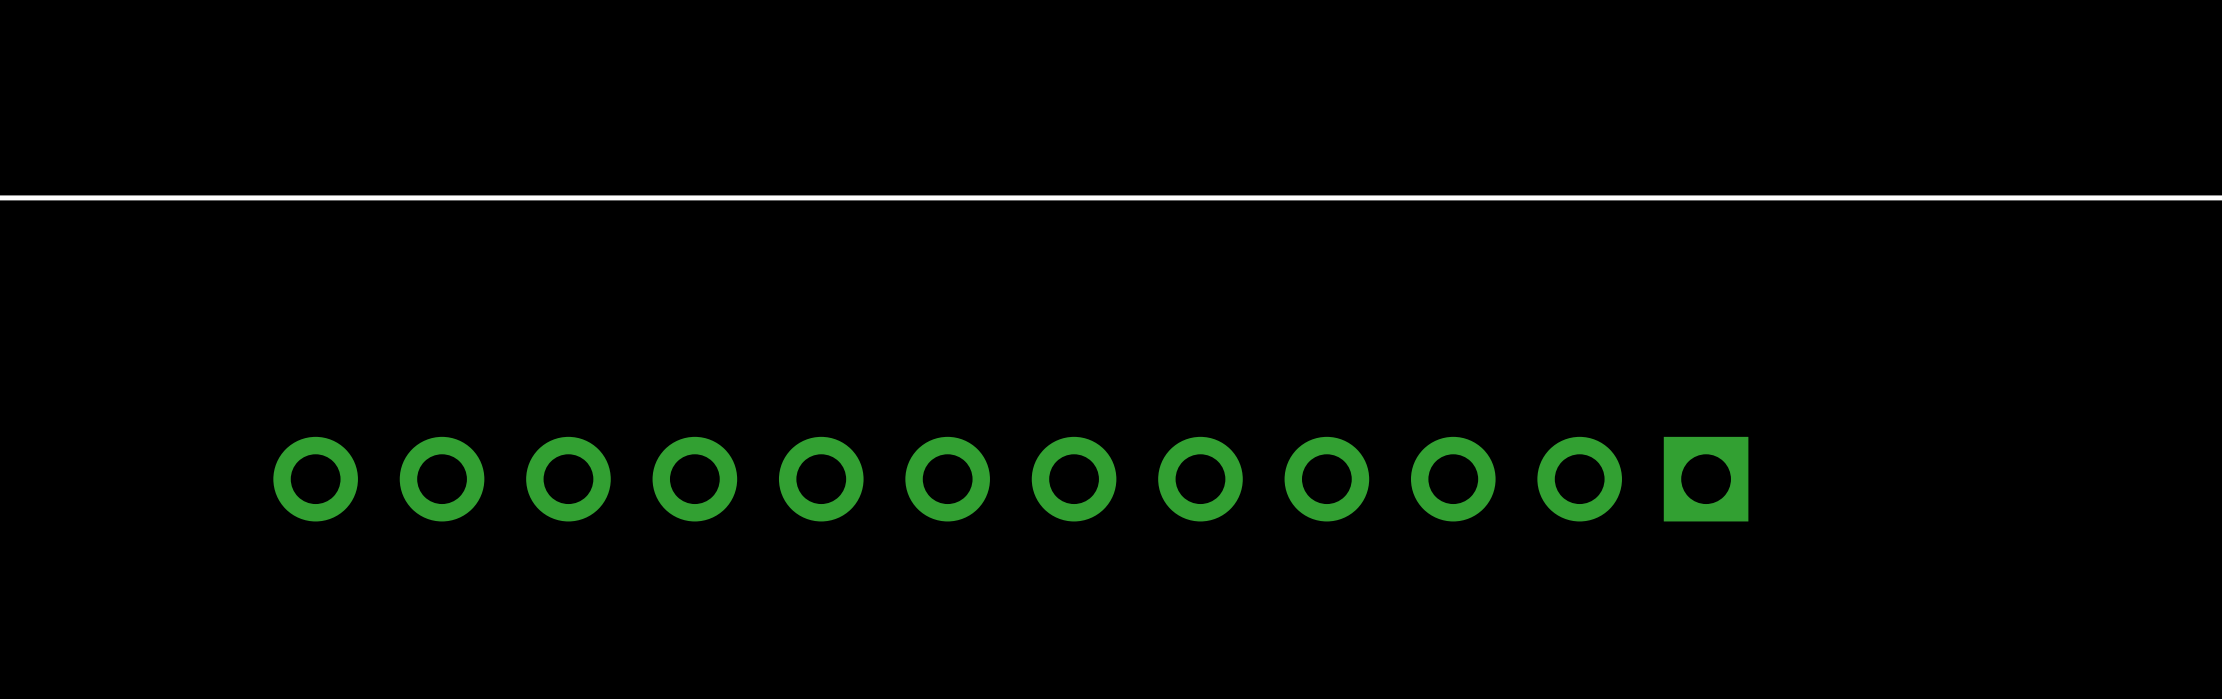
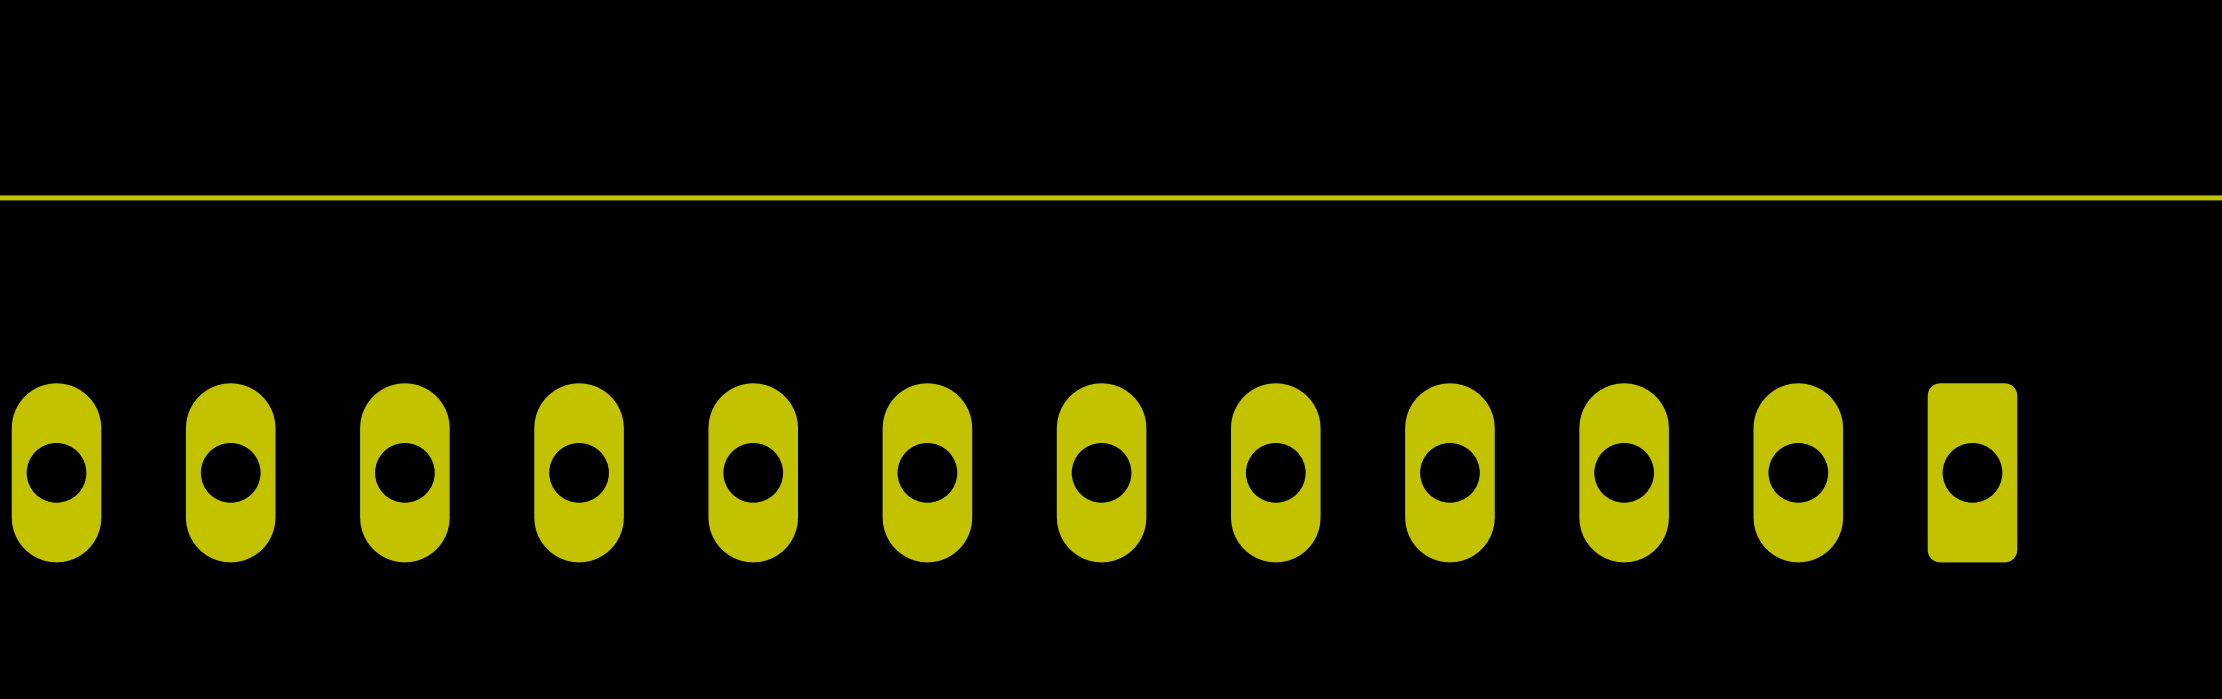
part footprint: [273, 436, 1749, 522] -> [11, 383, 2018, 563]

